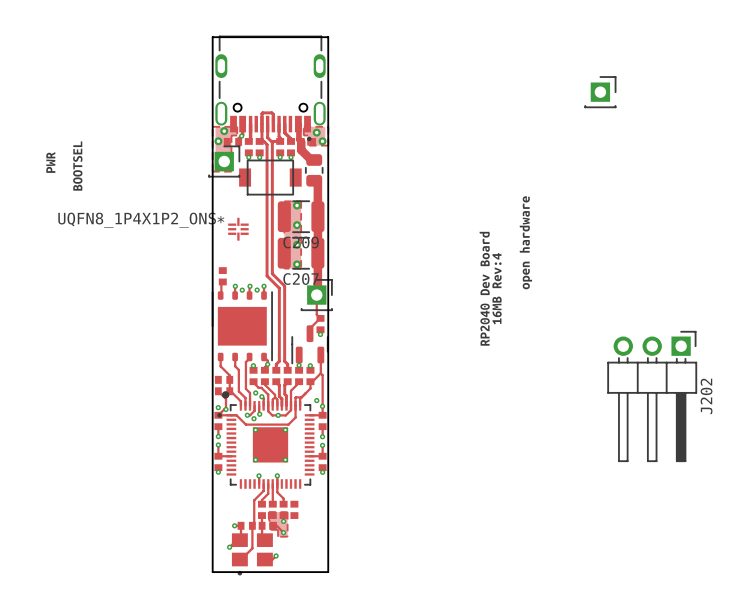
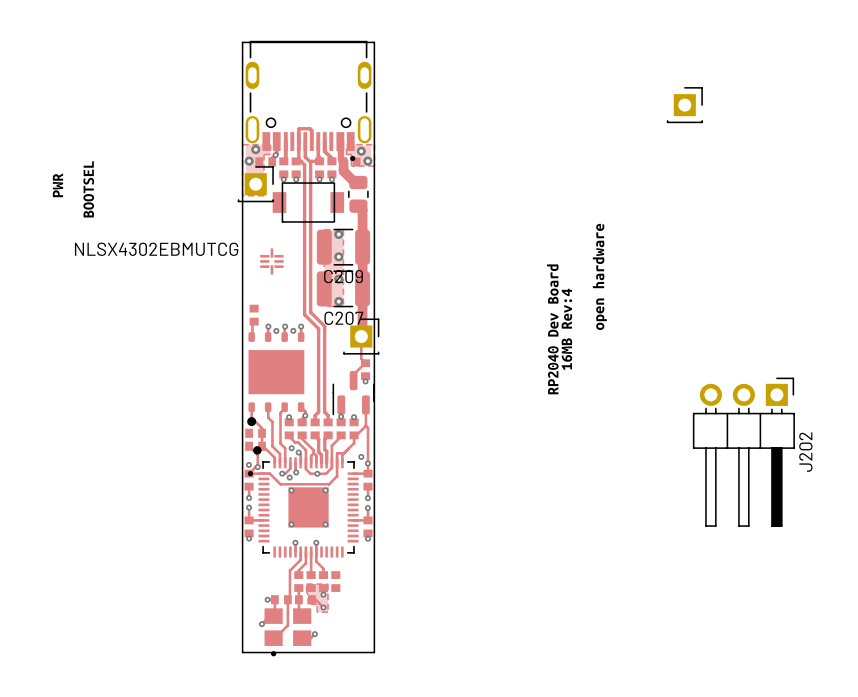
part text: * (220, 219) -> none
part value: UQFN8_1P4X1P2_ONS (137, 220) -> NLSX4302EBMUTCG (156, 249)
part footprint: [211, 291, 273, 362] -> [247, 332, 305, 427]

